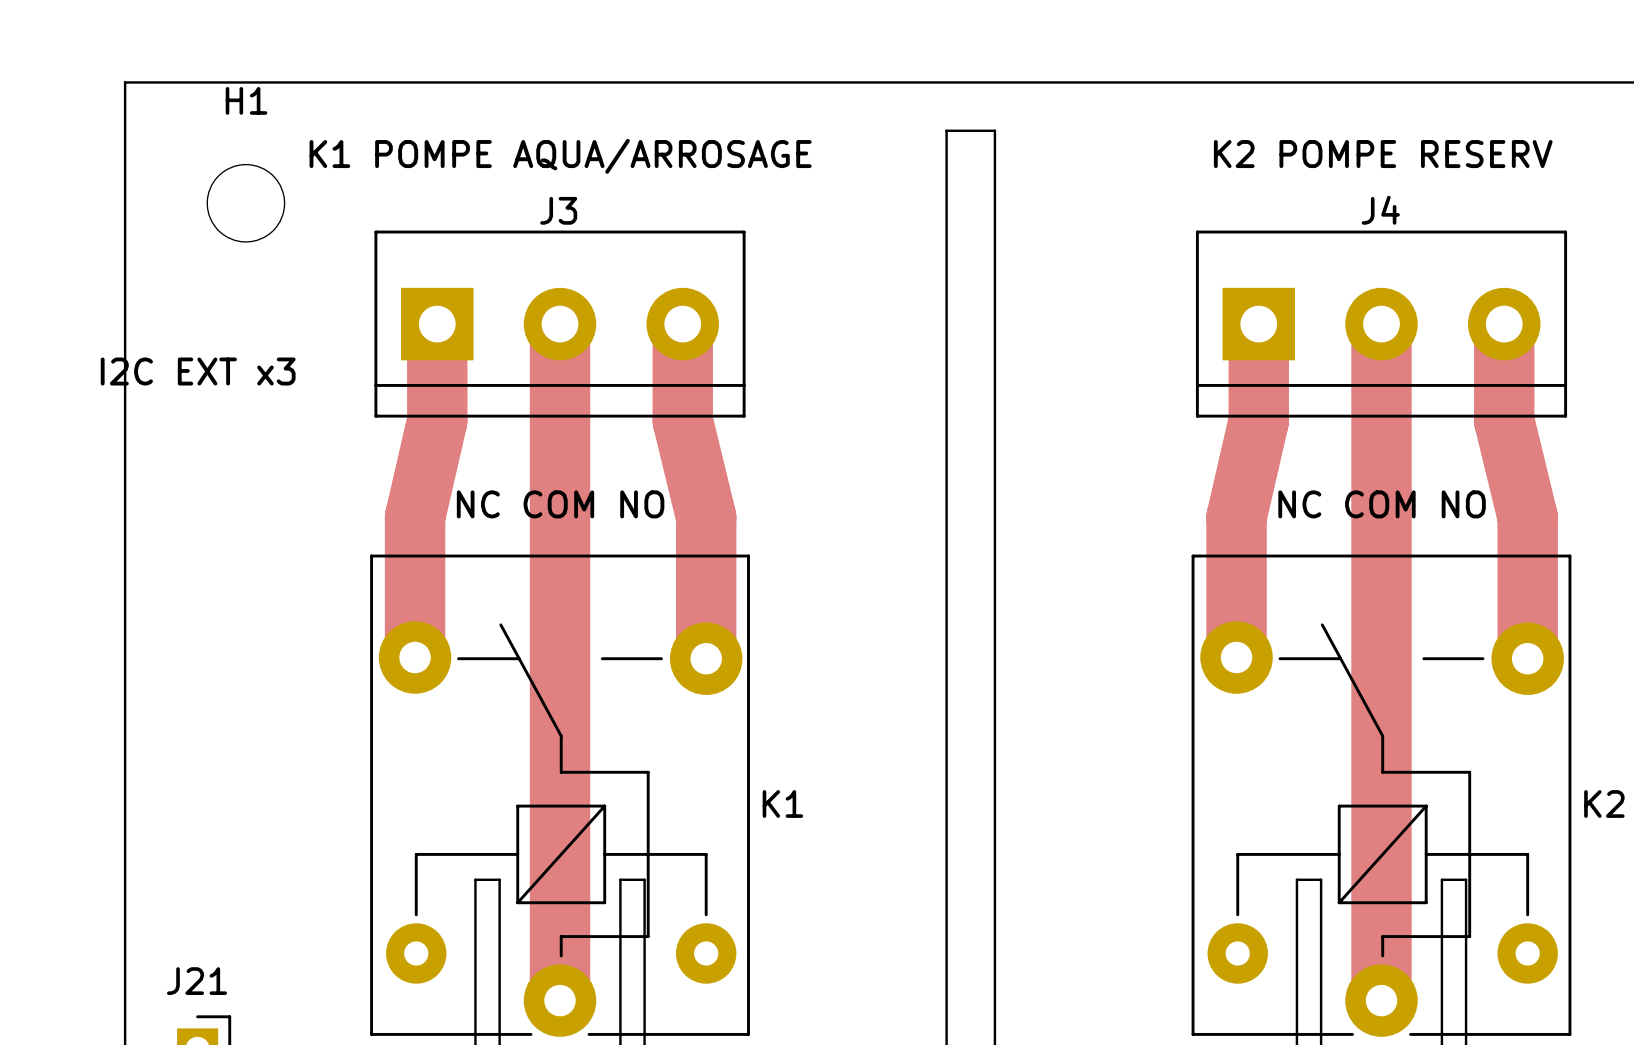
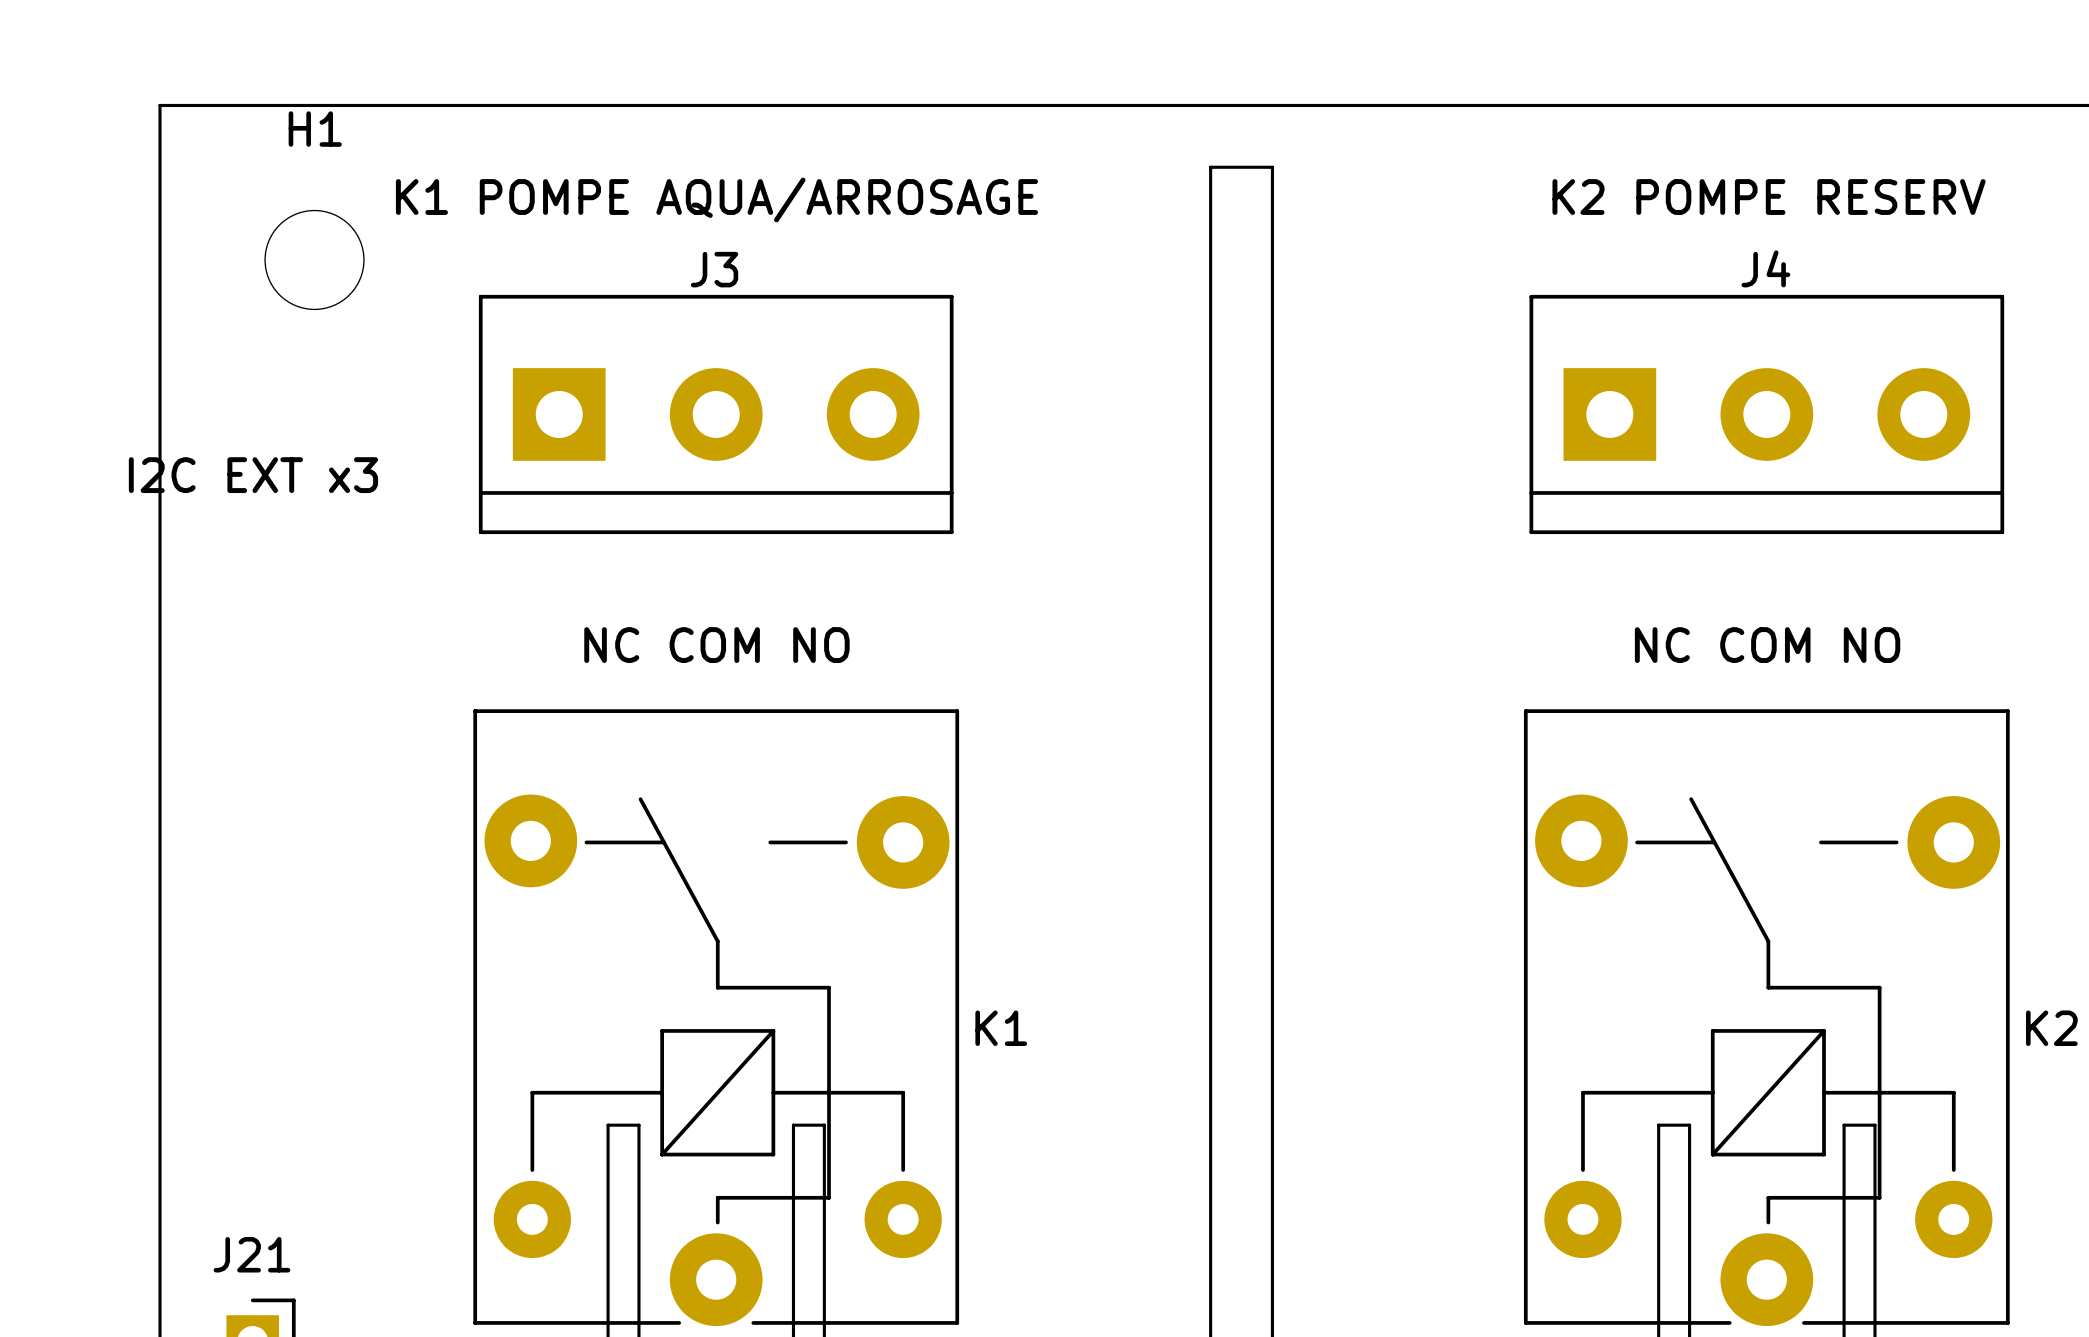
track: (437, 324) (437, 420) (415, 517) (415, 657) -> none
track: (560, 324) (560, 1000) -> none
track: (682, 324) (682, 420) (706, 517) (706, 658) -> none
track: (1258, 324) (1258, 420) (1236, 517) (1236, 657) -> none
track: (1381, 324) (1381, 1000) -> none
track: (1504, 324) (1504, 420) (1527, 517) (1527, 658) -> none

